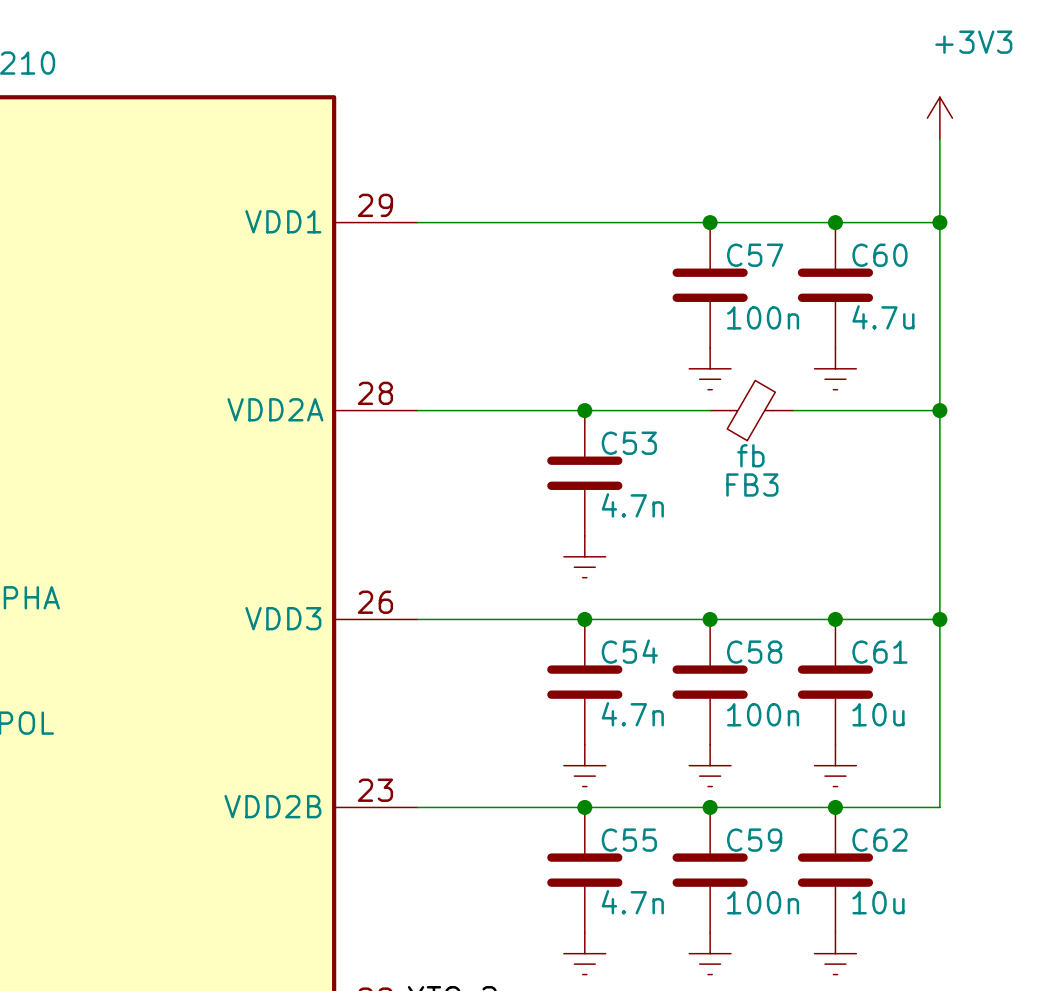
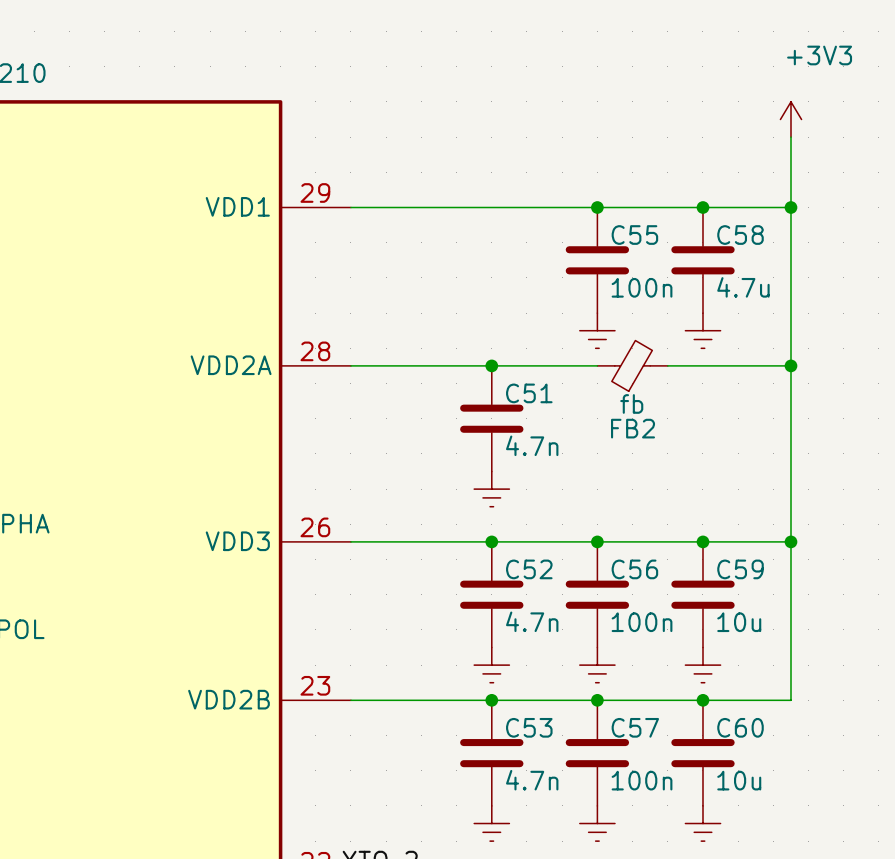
C57 name: C57 (755, 255) -> C55 (634, 235)
C60 name: C60 (879, 255) -> C58 (740, 235)
C53 name: C53 (629, 443) -> C51 (529, 393)
FB3 name: FB3 (752, 485) -> FB2 (633, 428)
C54 name: C54 (629, 651) -> C52 (529, 569)
C58 name: C58 (754, 652) -> C56 (634, 569)
C61 name: C61 (879, 652) -> C59 (740, 569)
C55 name: C55 (629, 840) -> C53 (529, 727)
C59 name: C59 (754, 840) -> C57 (635, 727)
C62 name: C62 (879, 840) -> C60 (740, 727)

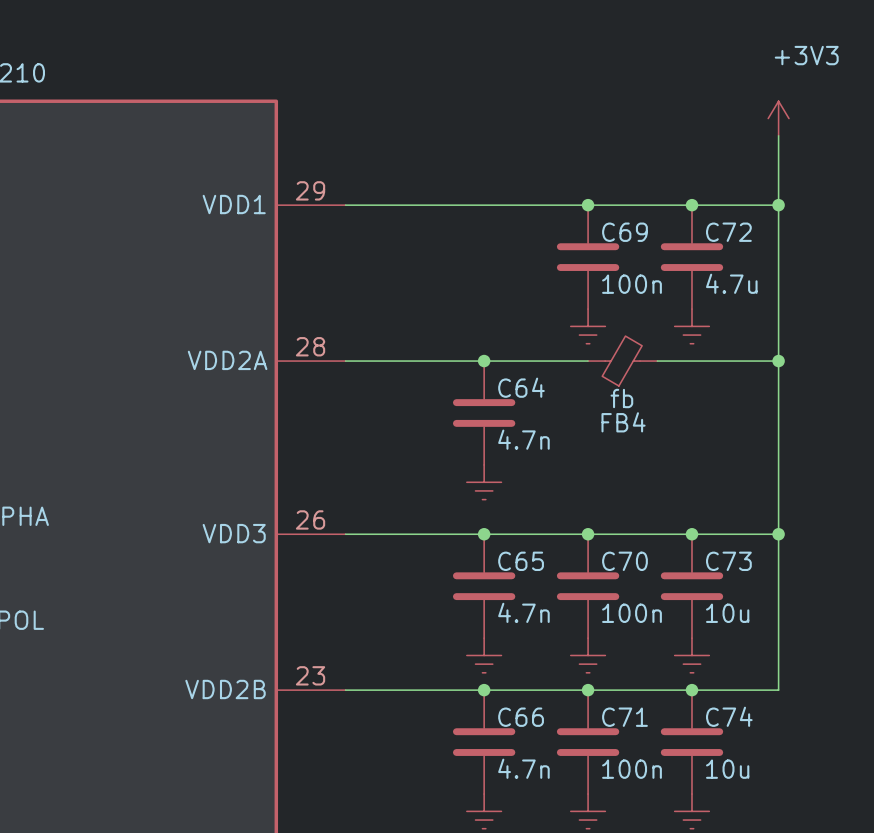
C55 name: C55 (634, 235) -> C69 (624, 232)
C58 name: C58 (740, 235) -> C72 (728, 232)
C51 name: C51 (529, 393) -> C64 (521, 387)
FB2 name: FB2 (633, 428) -> FB4 (623, 422)
C52 name: C52 (529, 569) -> C65 (521, 561)
C56 name: C56 (634, 569) -> C70 (624, 561)
C59 name: C59 (740, 569) -> C73 (728, 561)
C53 name: C53 (529, 727) -> C66 (521, 717)
C57 name: C57 (635, 727) -> C71 (624, 717)
C60 name: C60 (740, 727) -> C74 (729, 716)

